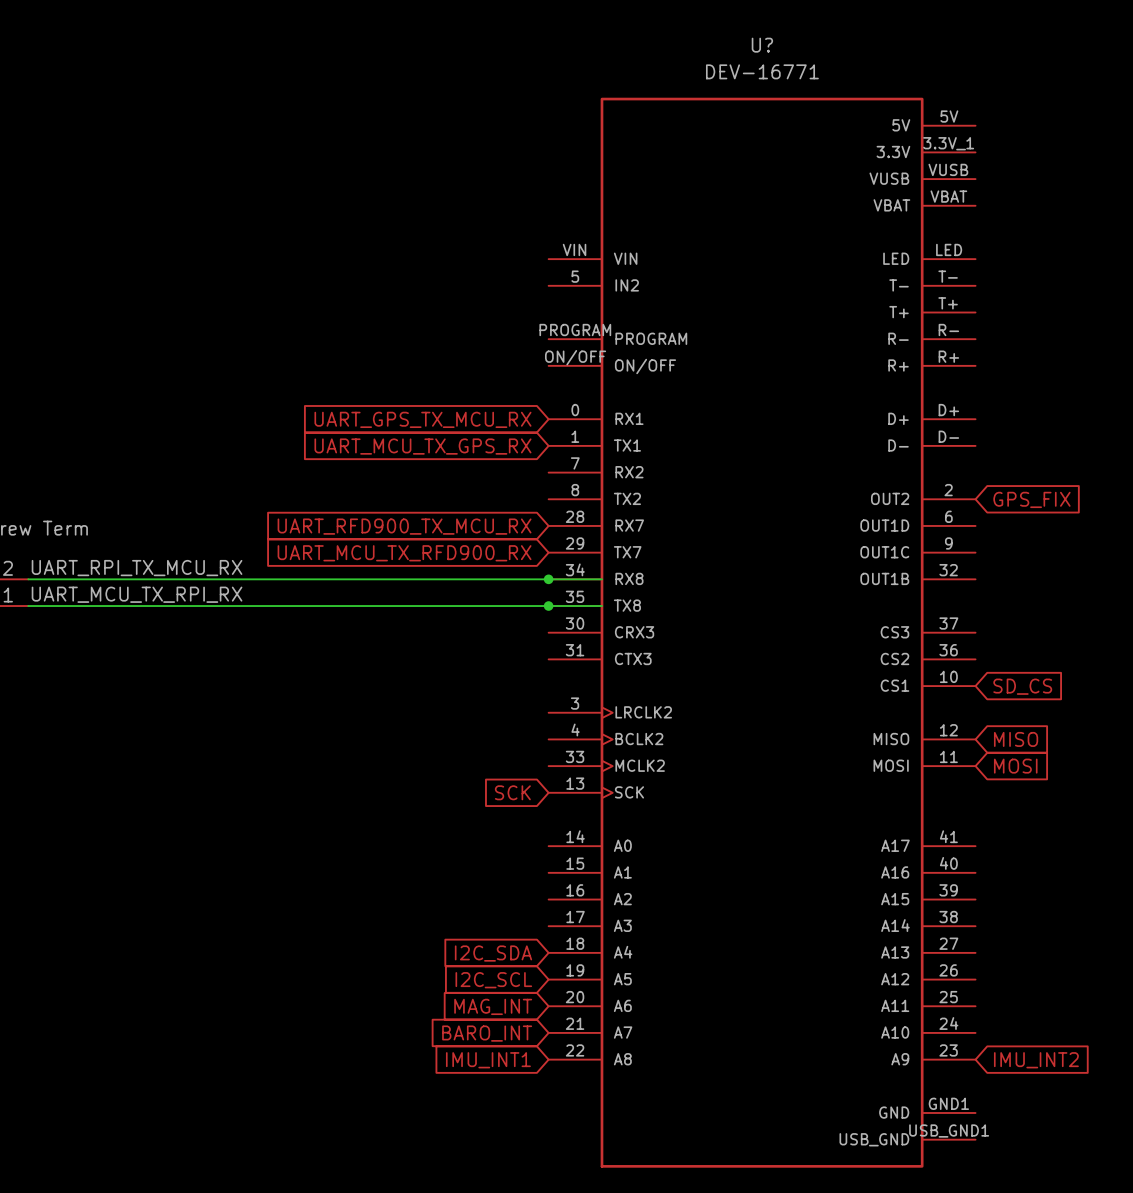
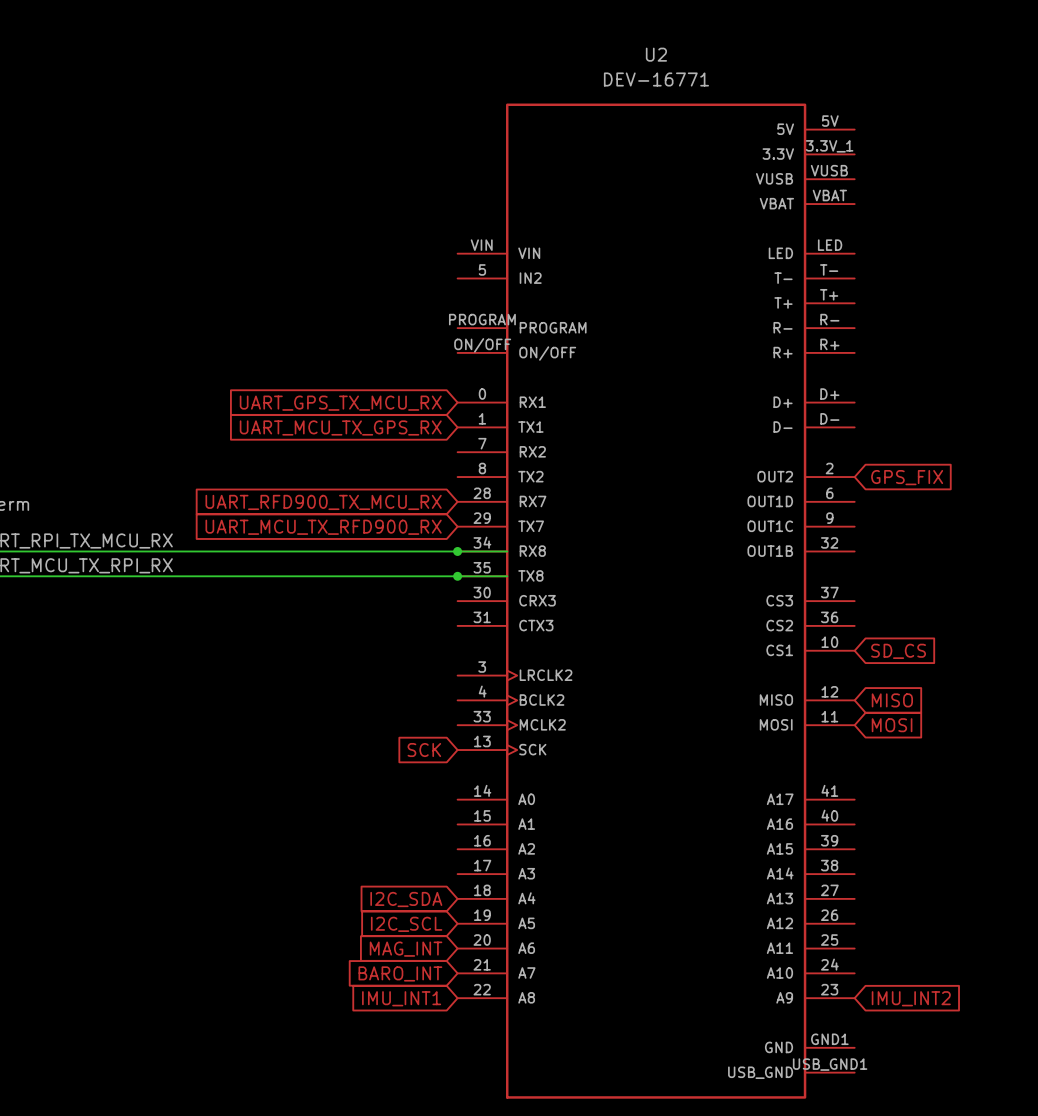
U? name: U? (762, 45) -> U2 (656, 54)

